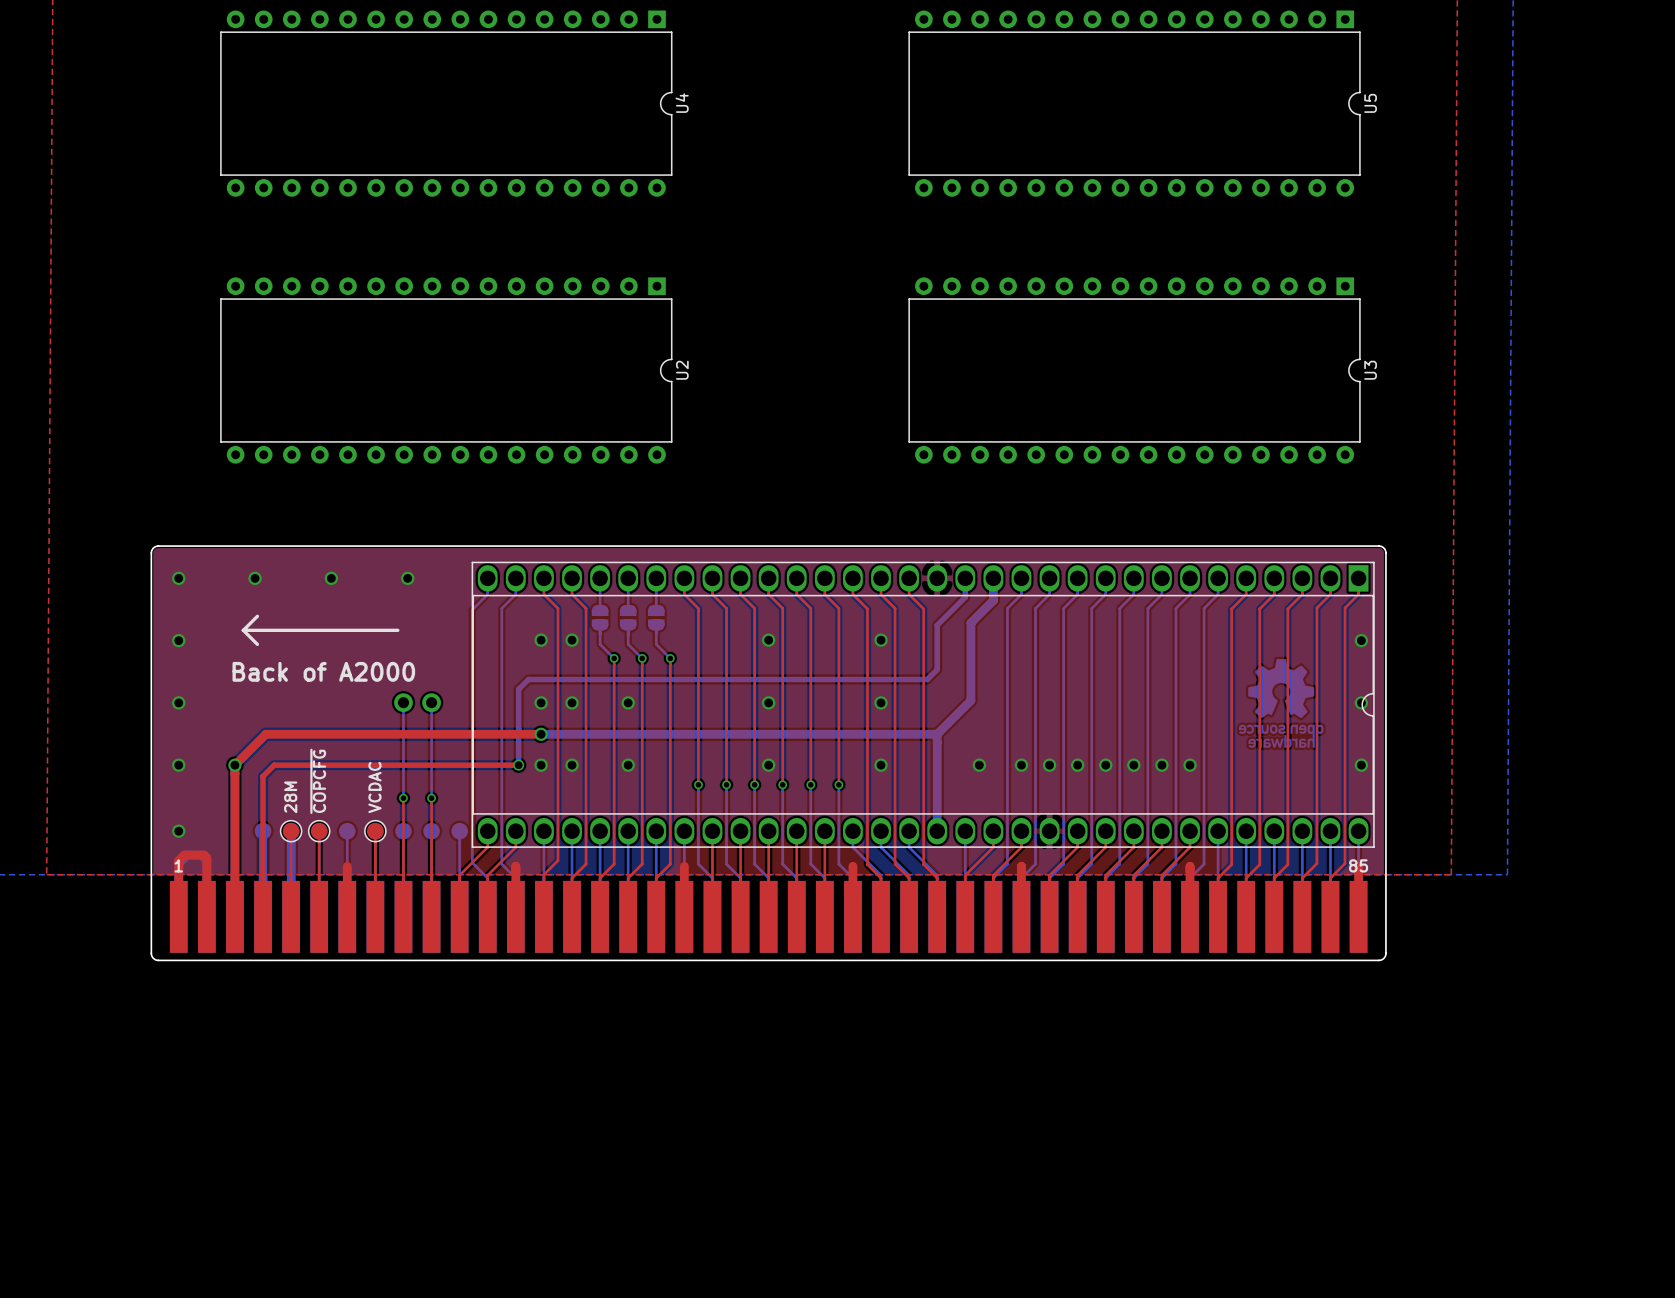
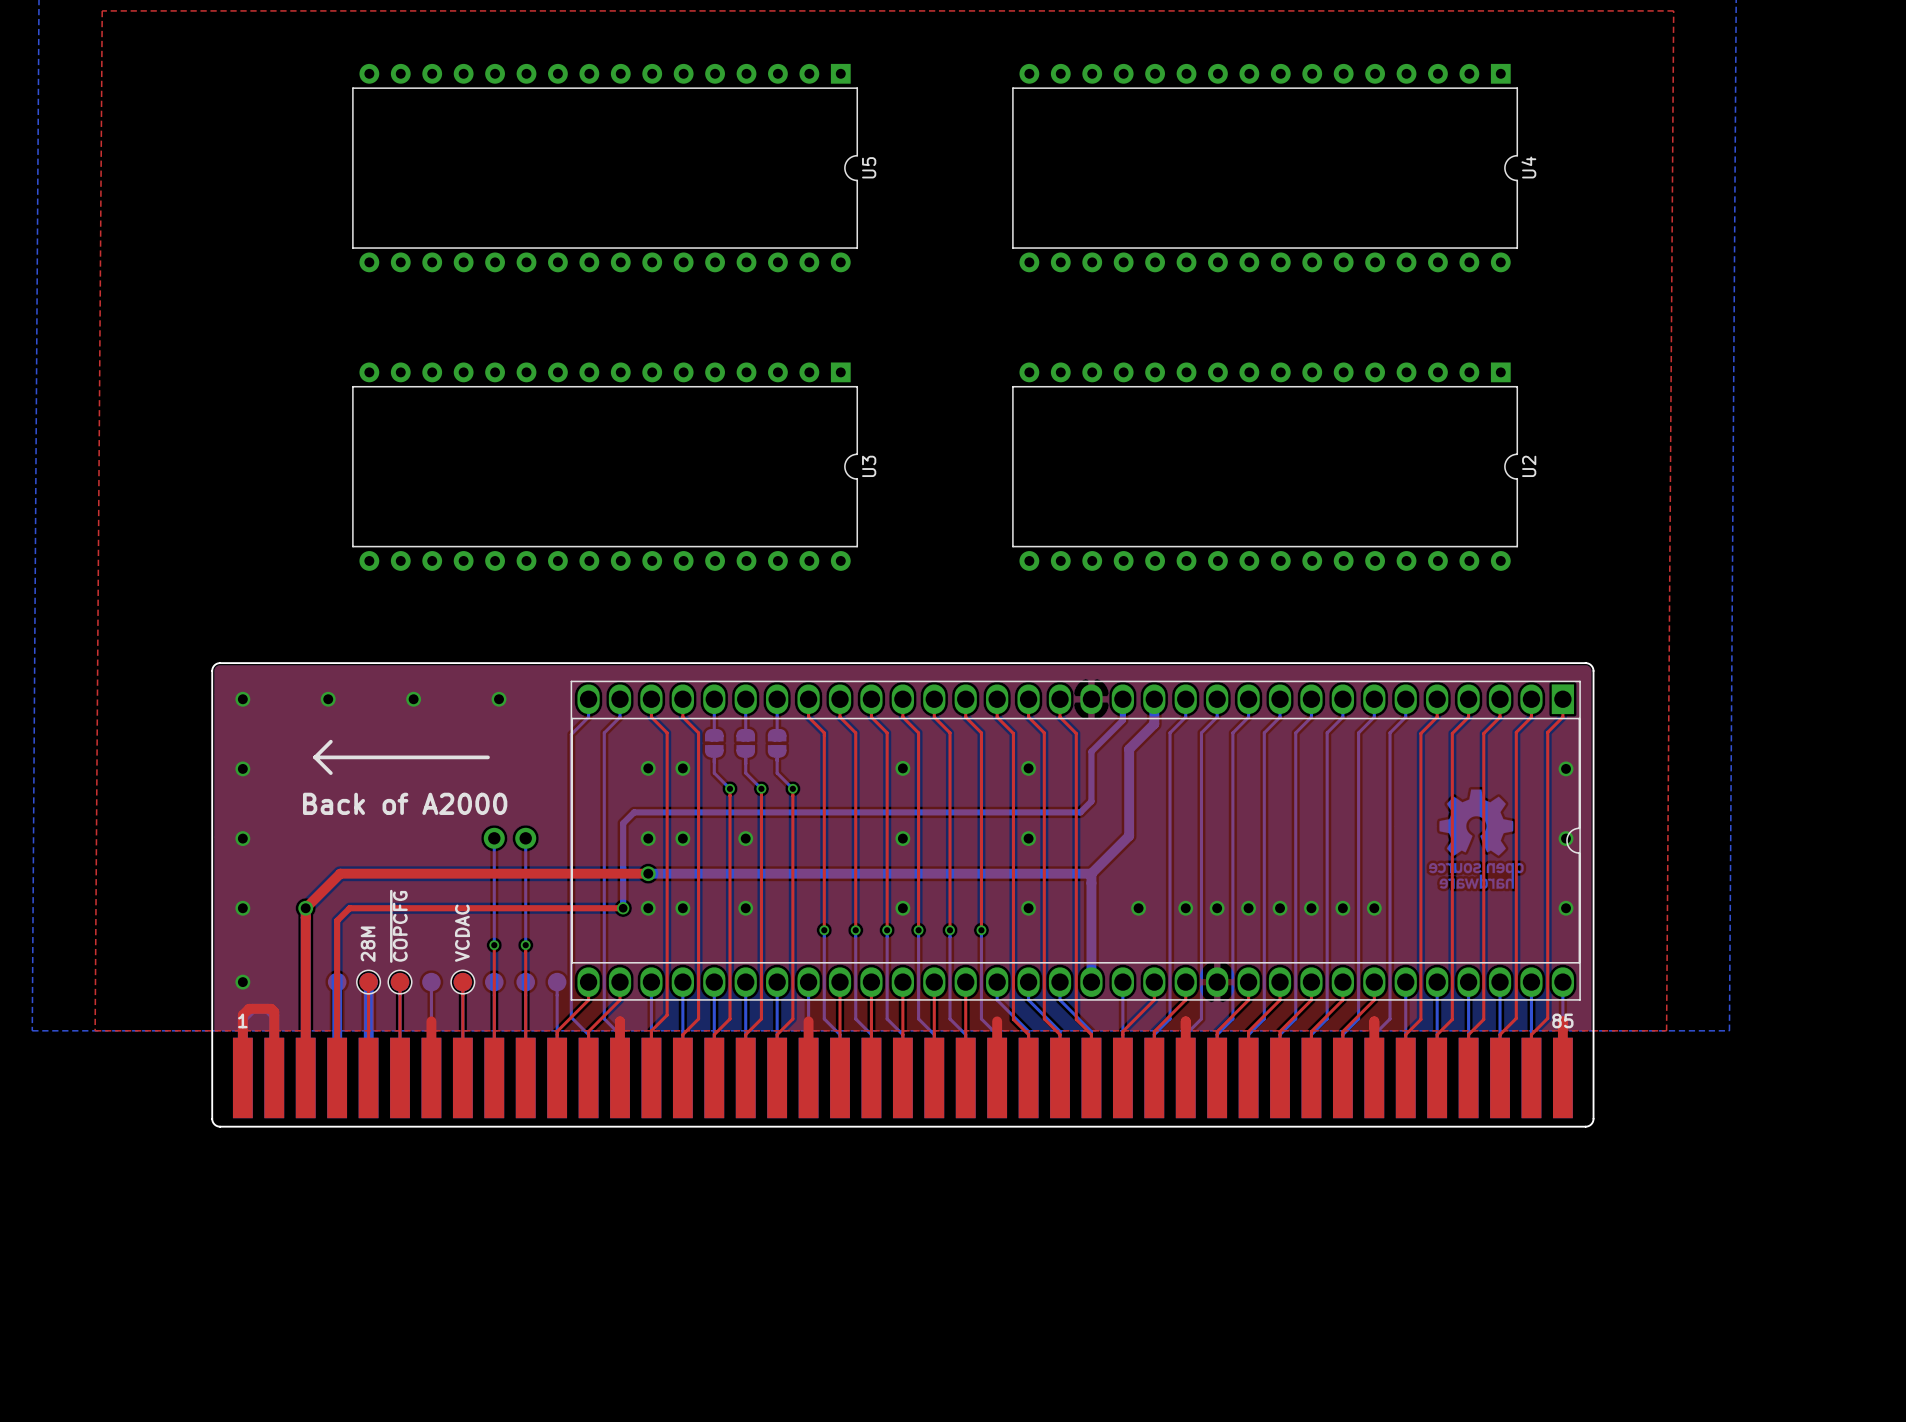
U4 position: (446, 103) -> (1265, 168)
U5 position: (1134, 103) -> (605, 168)
U2 position: (446, 370) -> (1265, 466)
U3 position: (1134, 370) -> (605, 466)

